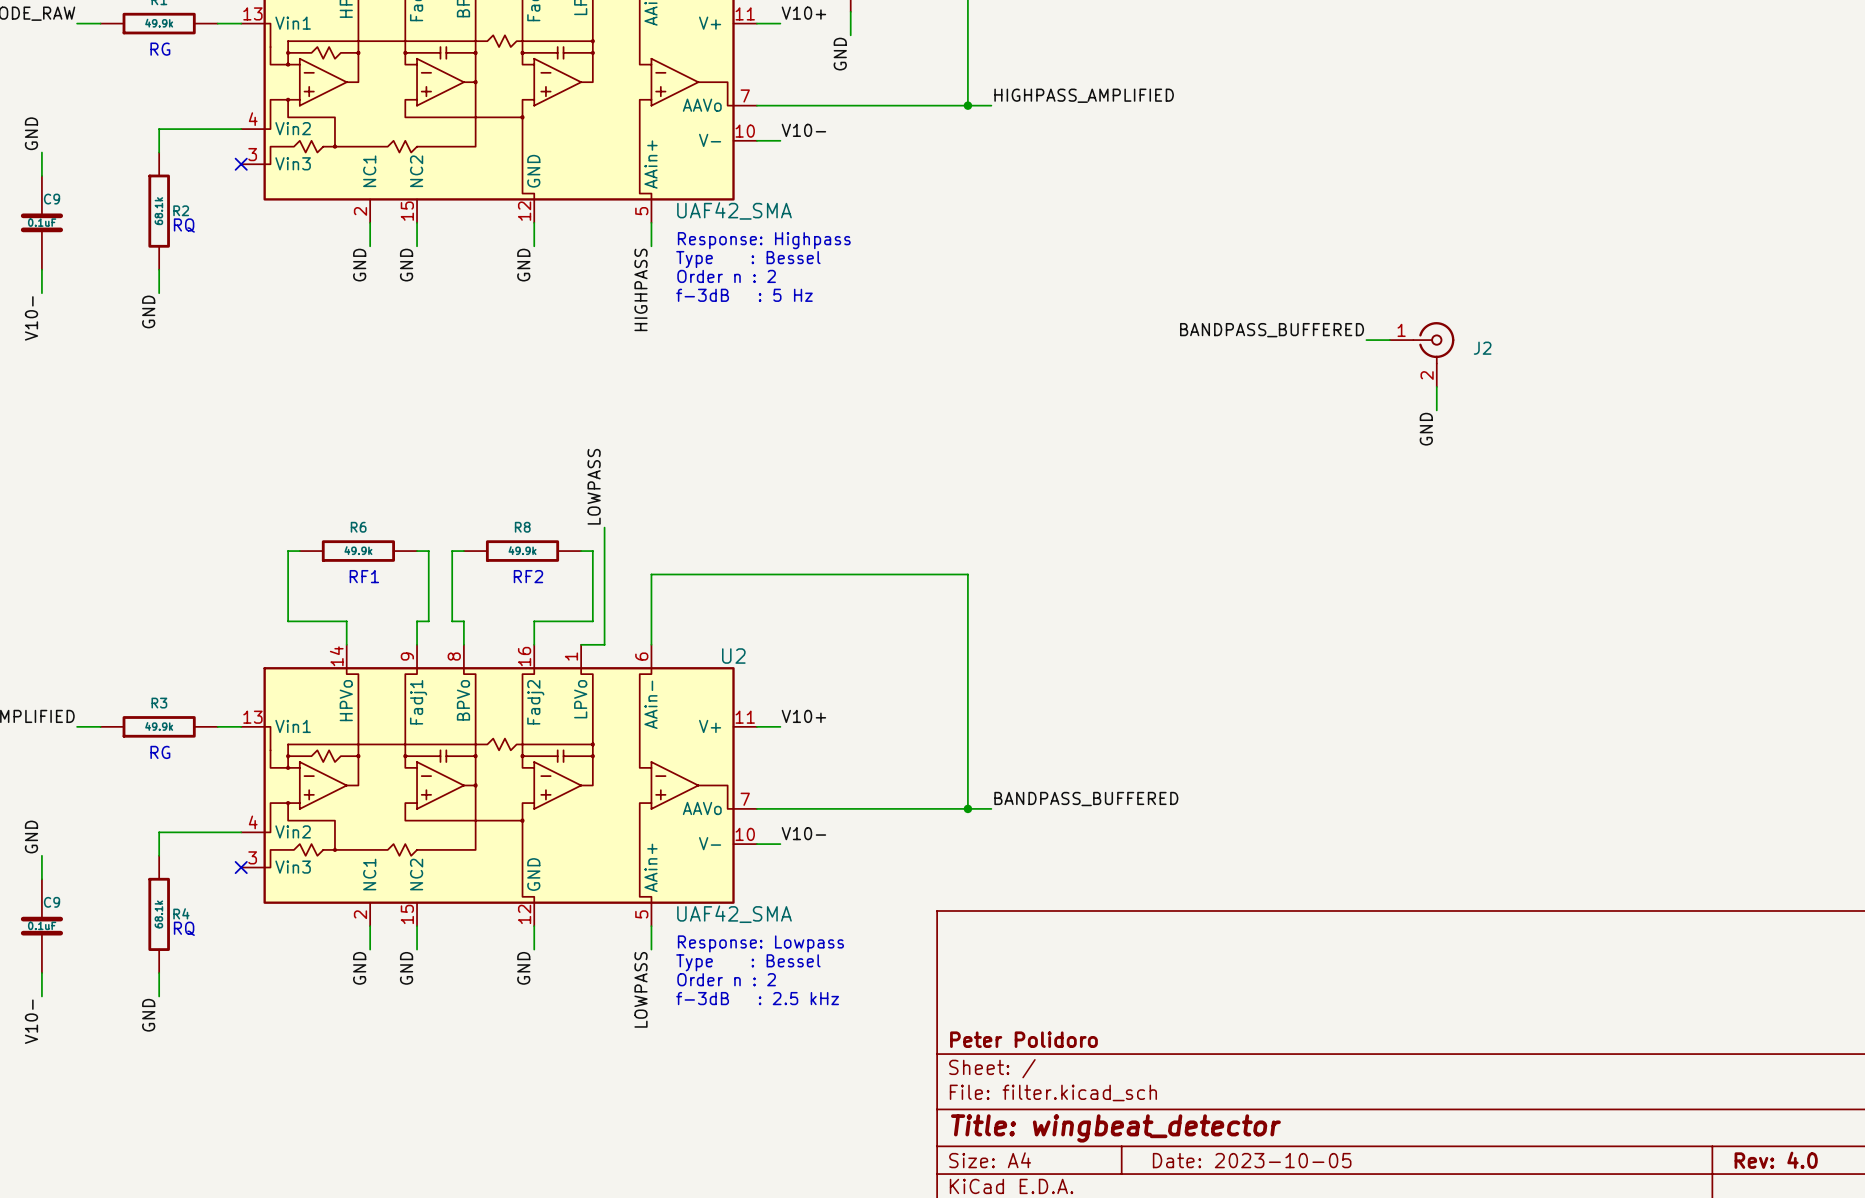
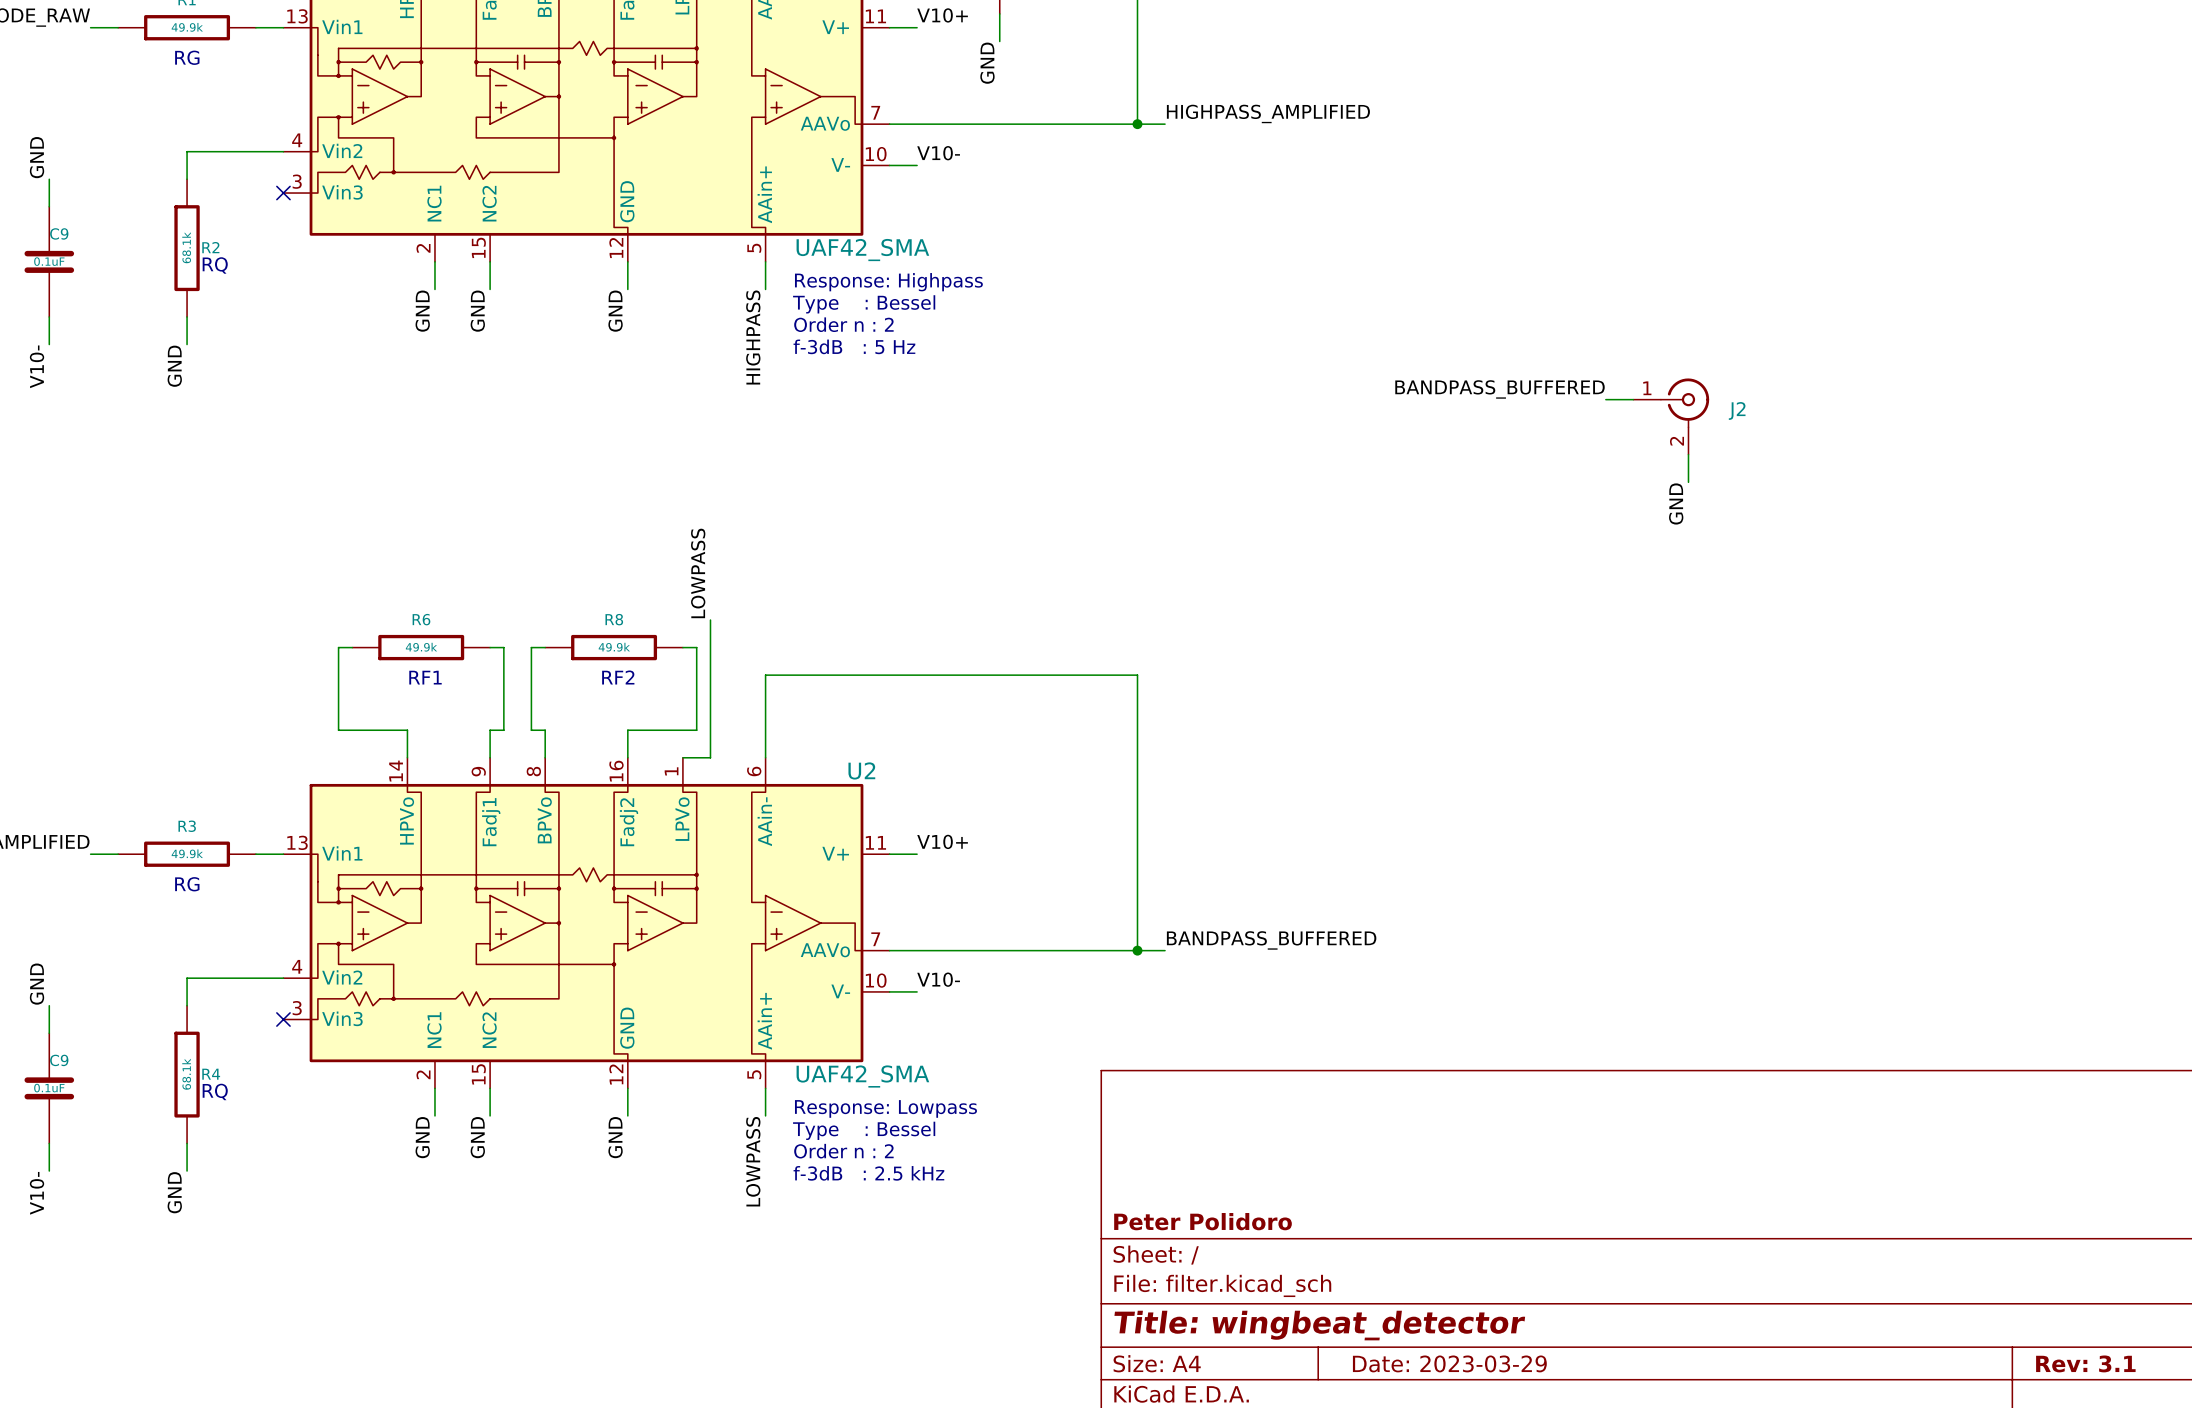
title block: Date: 2023-10-05 (1252, 1160) -> Date: 2023-03-29 (1449, 1363)
title block: Rev: 4.0 (1776, 1160) -> Rev: 3.1 (2085, 1363)

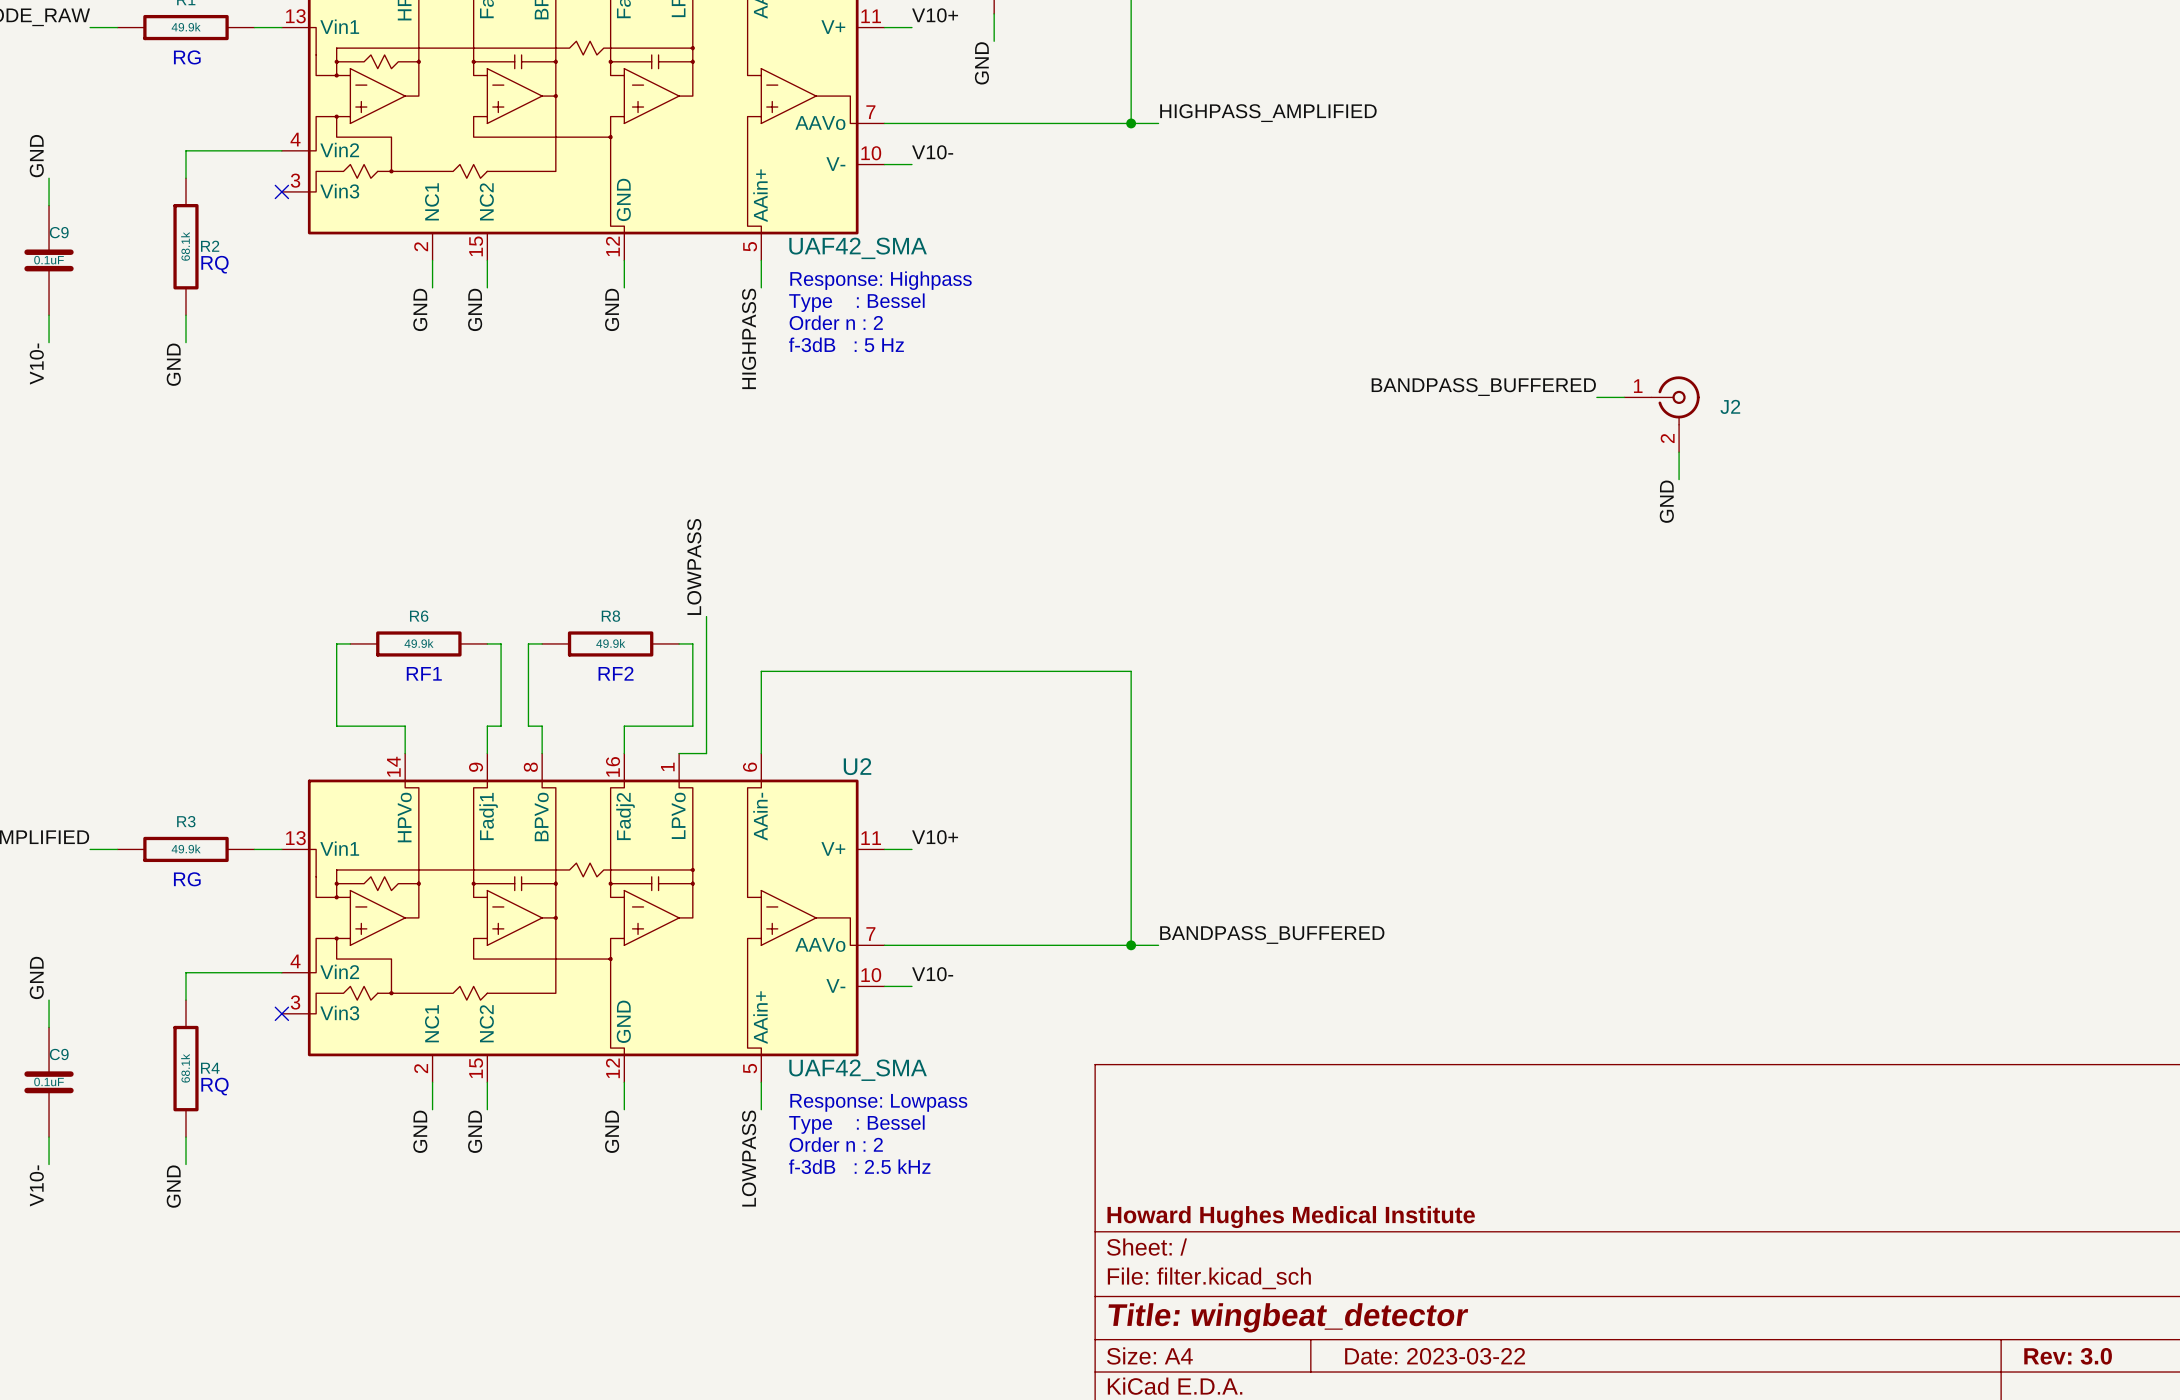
title block: Peter Polidoro (1203, 1221) -> Howard Hughes Medical Institute (1291, 1217)
title block: Date: 2023-03-29 (1449, 1363) -> Date: 2023-03-22 (1435, 1356)
title block: Rev: 3.1 (2085, 1363) -> Rev: 3.0 (2068, 1356)

